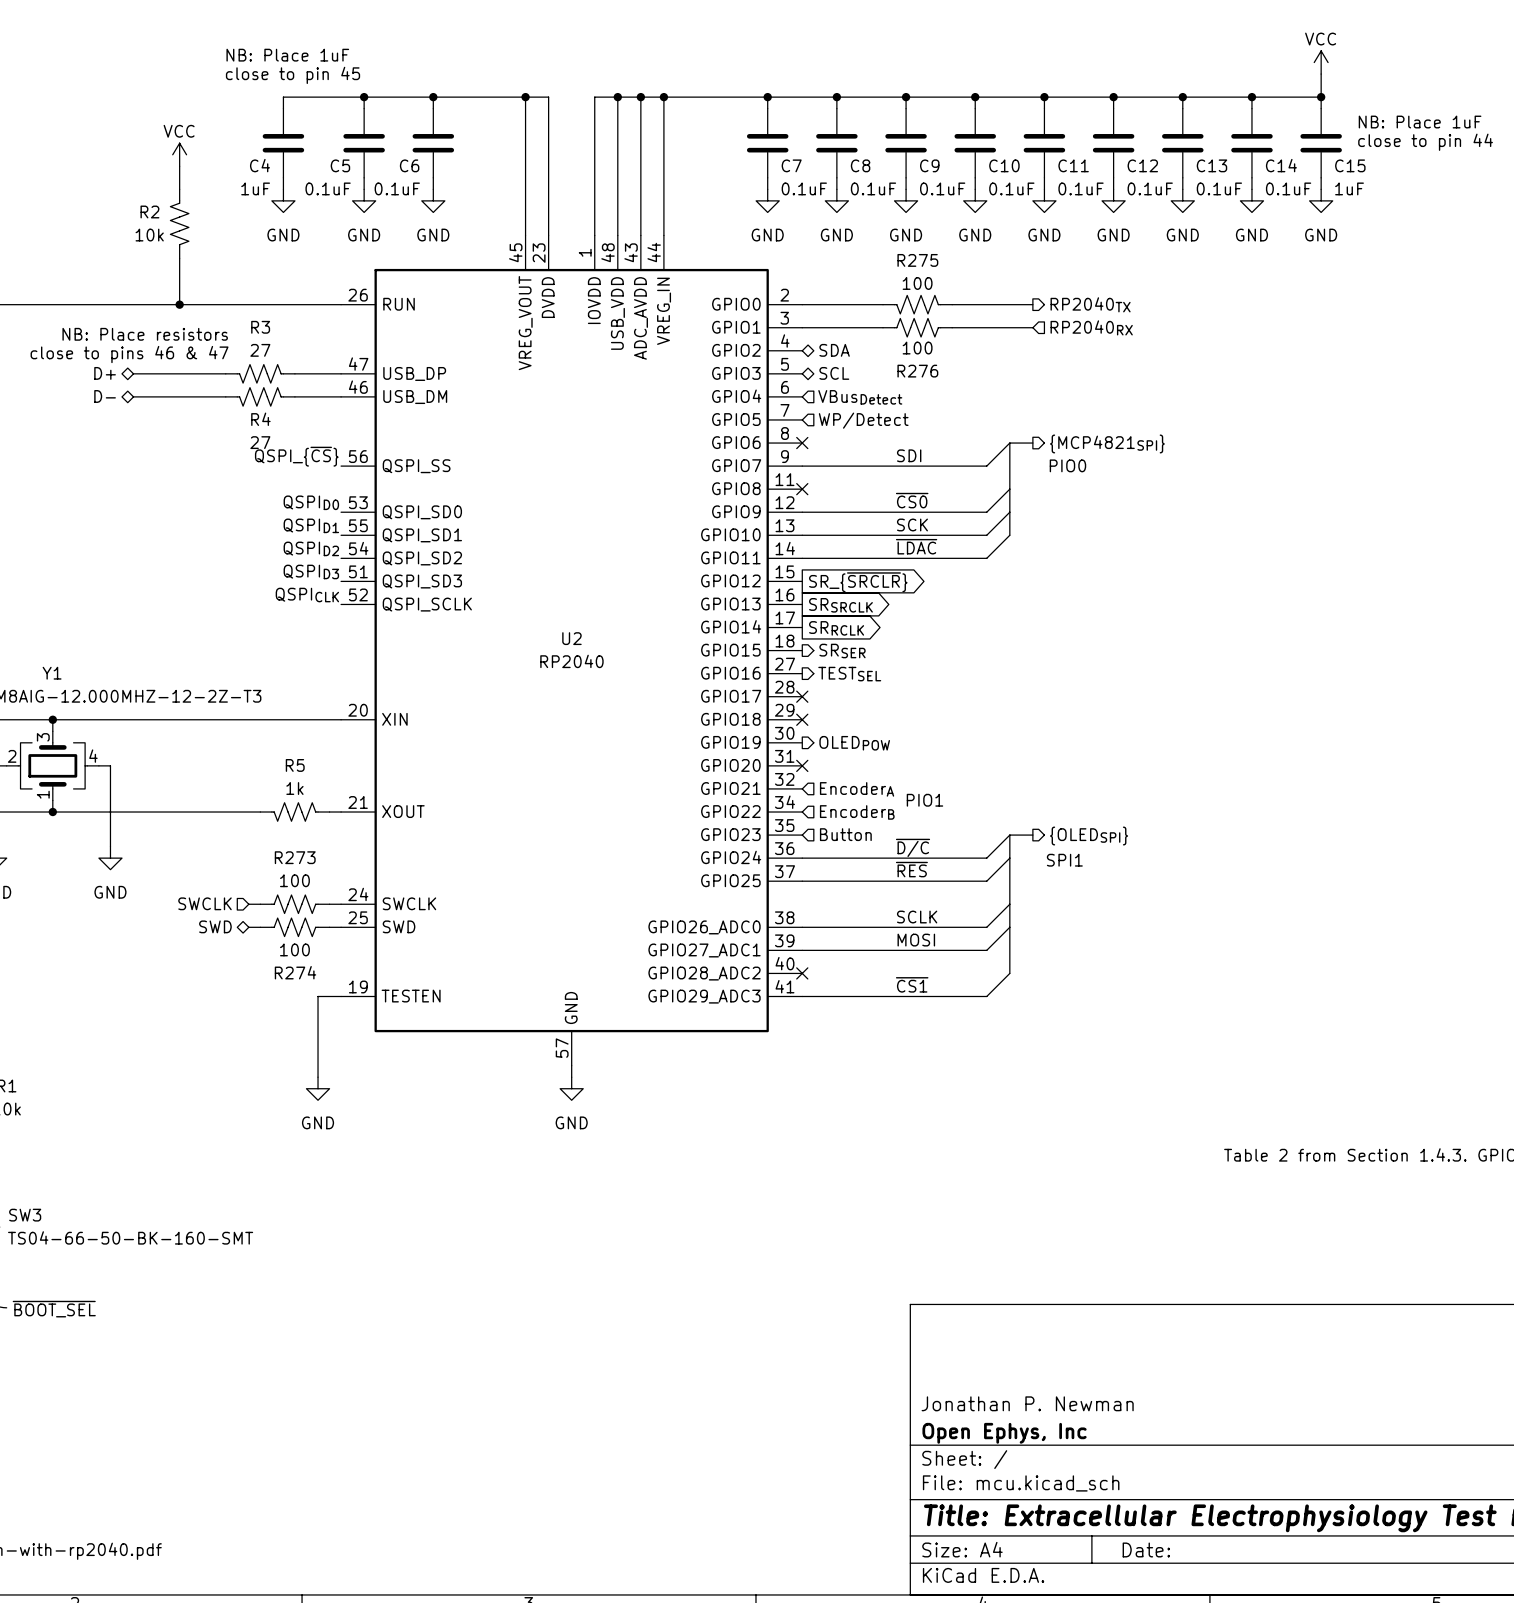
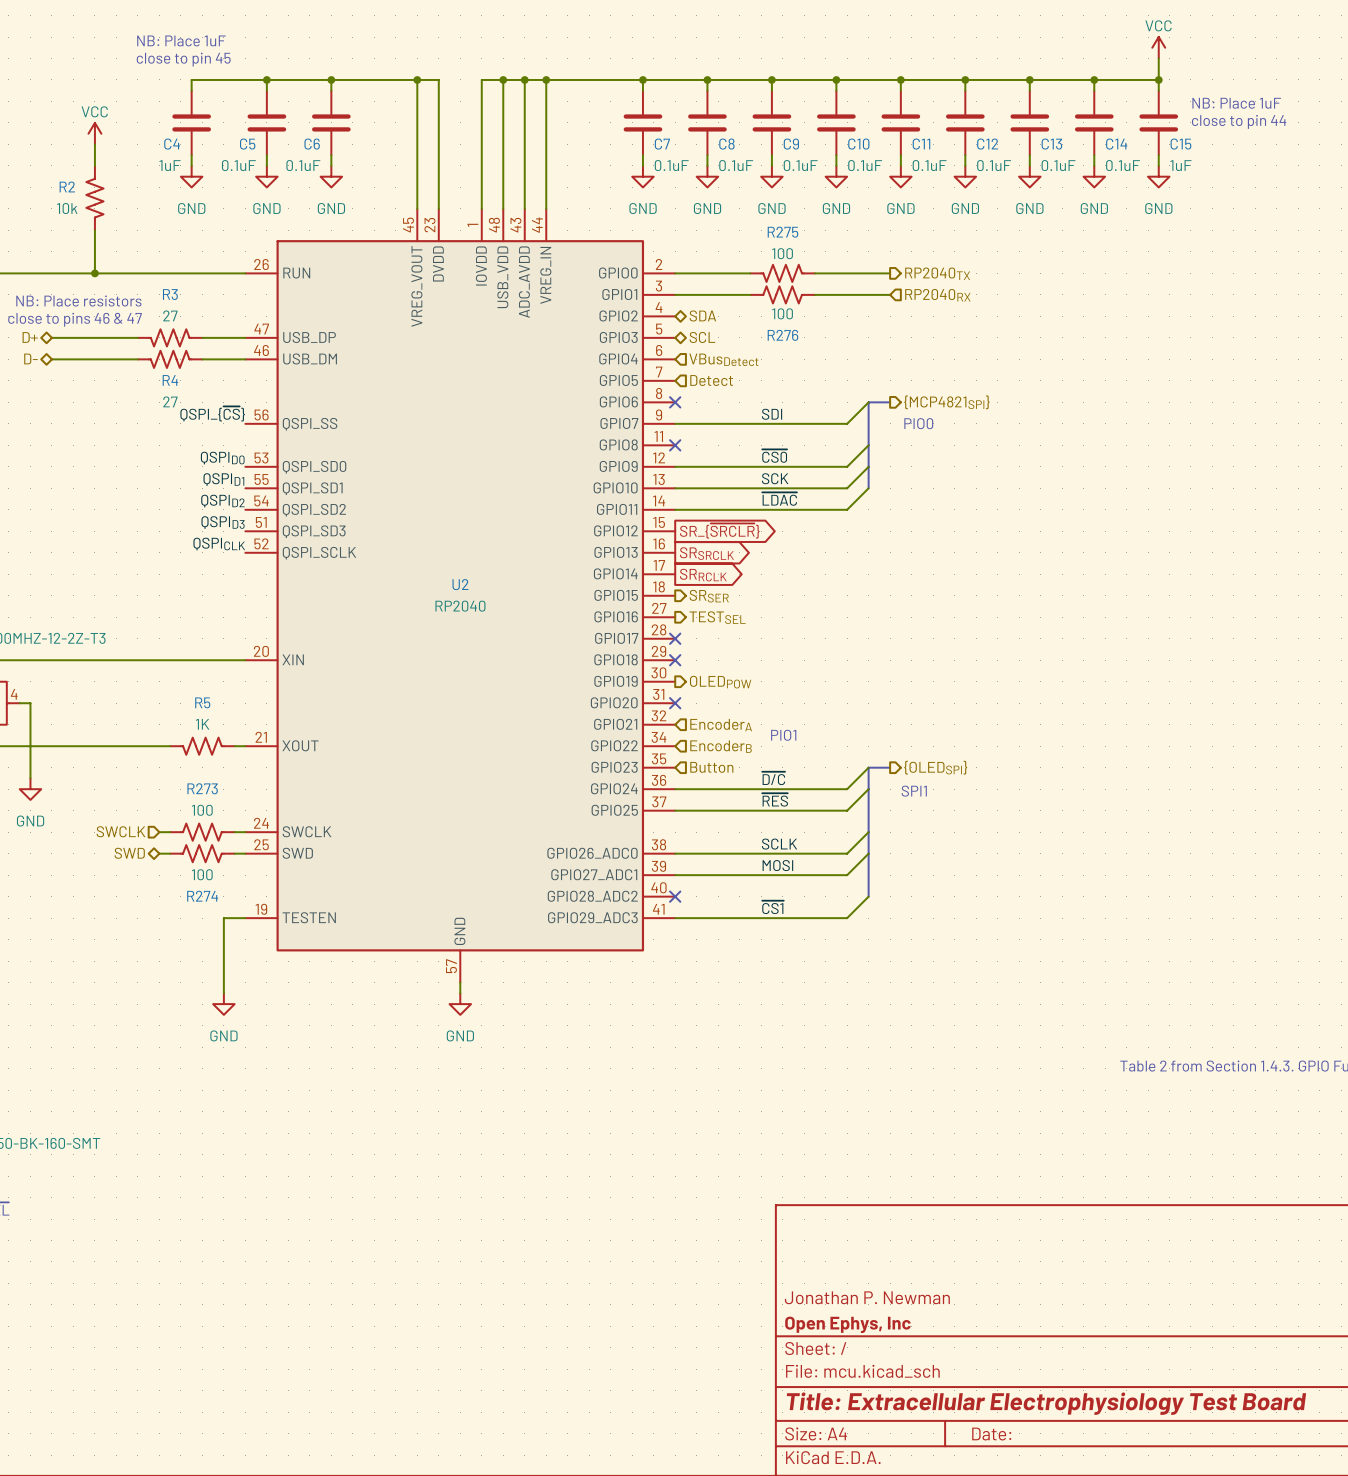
hierarchical label: WP/Detect (863, 420) -> Detect (711, 380)
R5 value: 1k (294, 788) -> 1K (202, 724)

